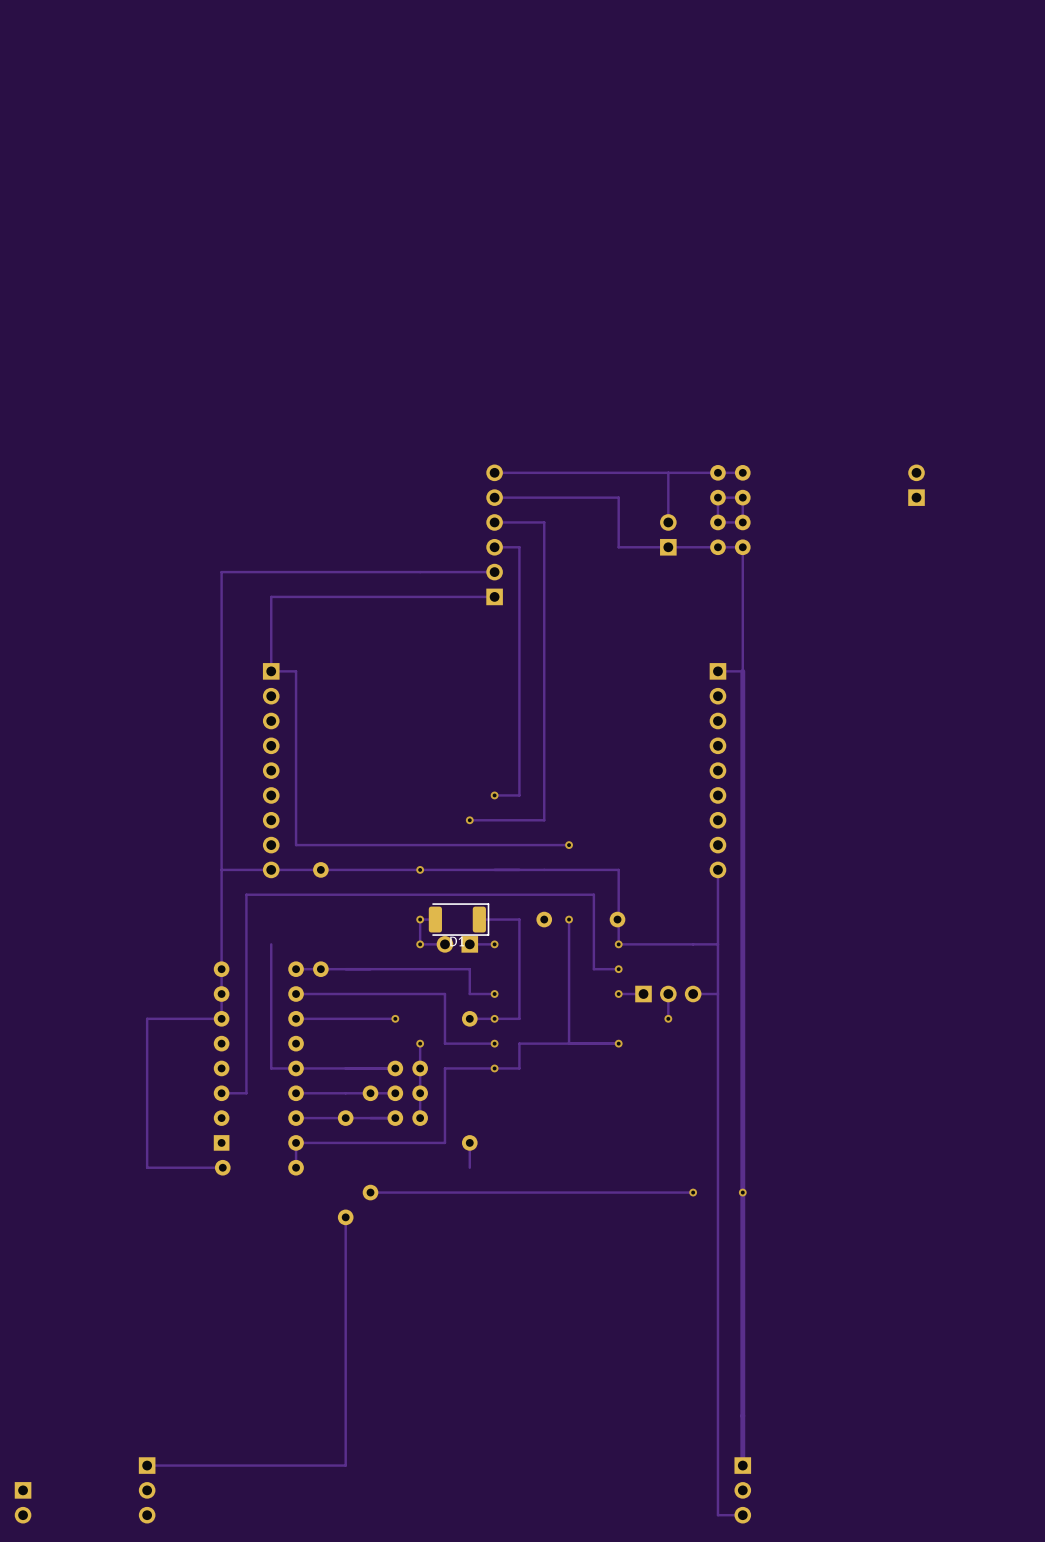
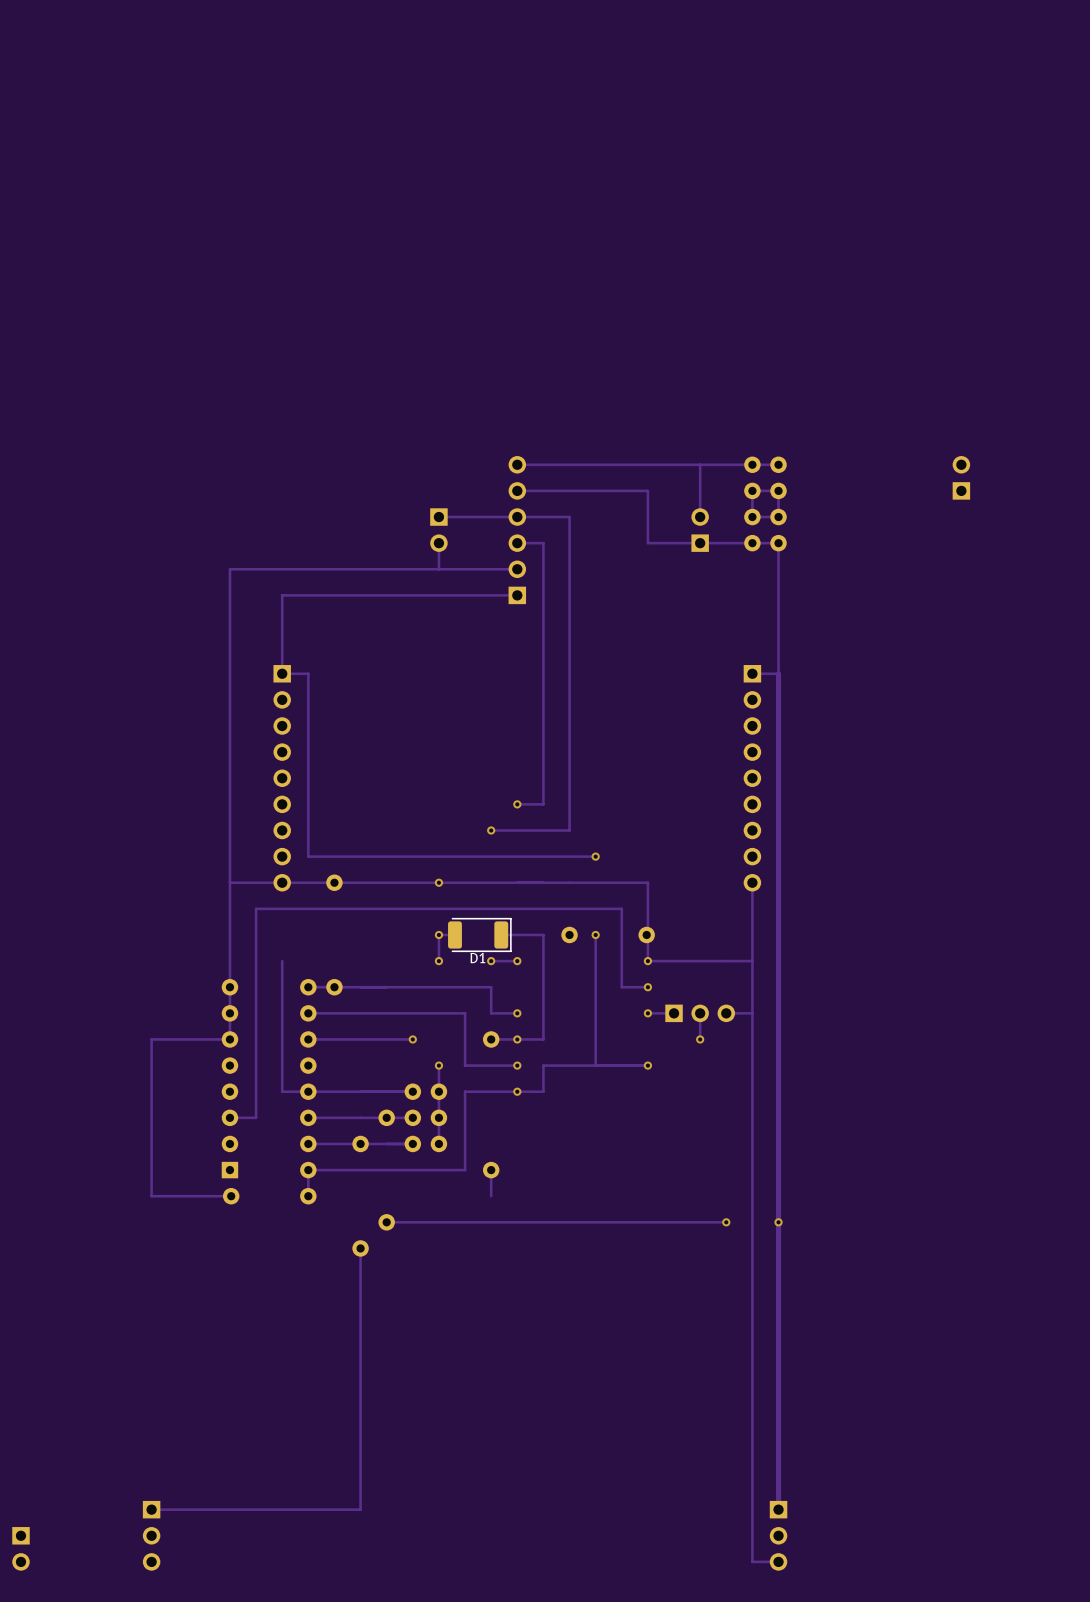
track: none -> (517, 517) (438, 517)
part: none -> (438, 530)
track: none -> (438, 543) (438, 569)
track: (444, 944) (420, 944) -> none
part: (457, 944) -> none
via: none -> (491, 961)

